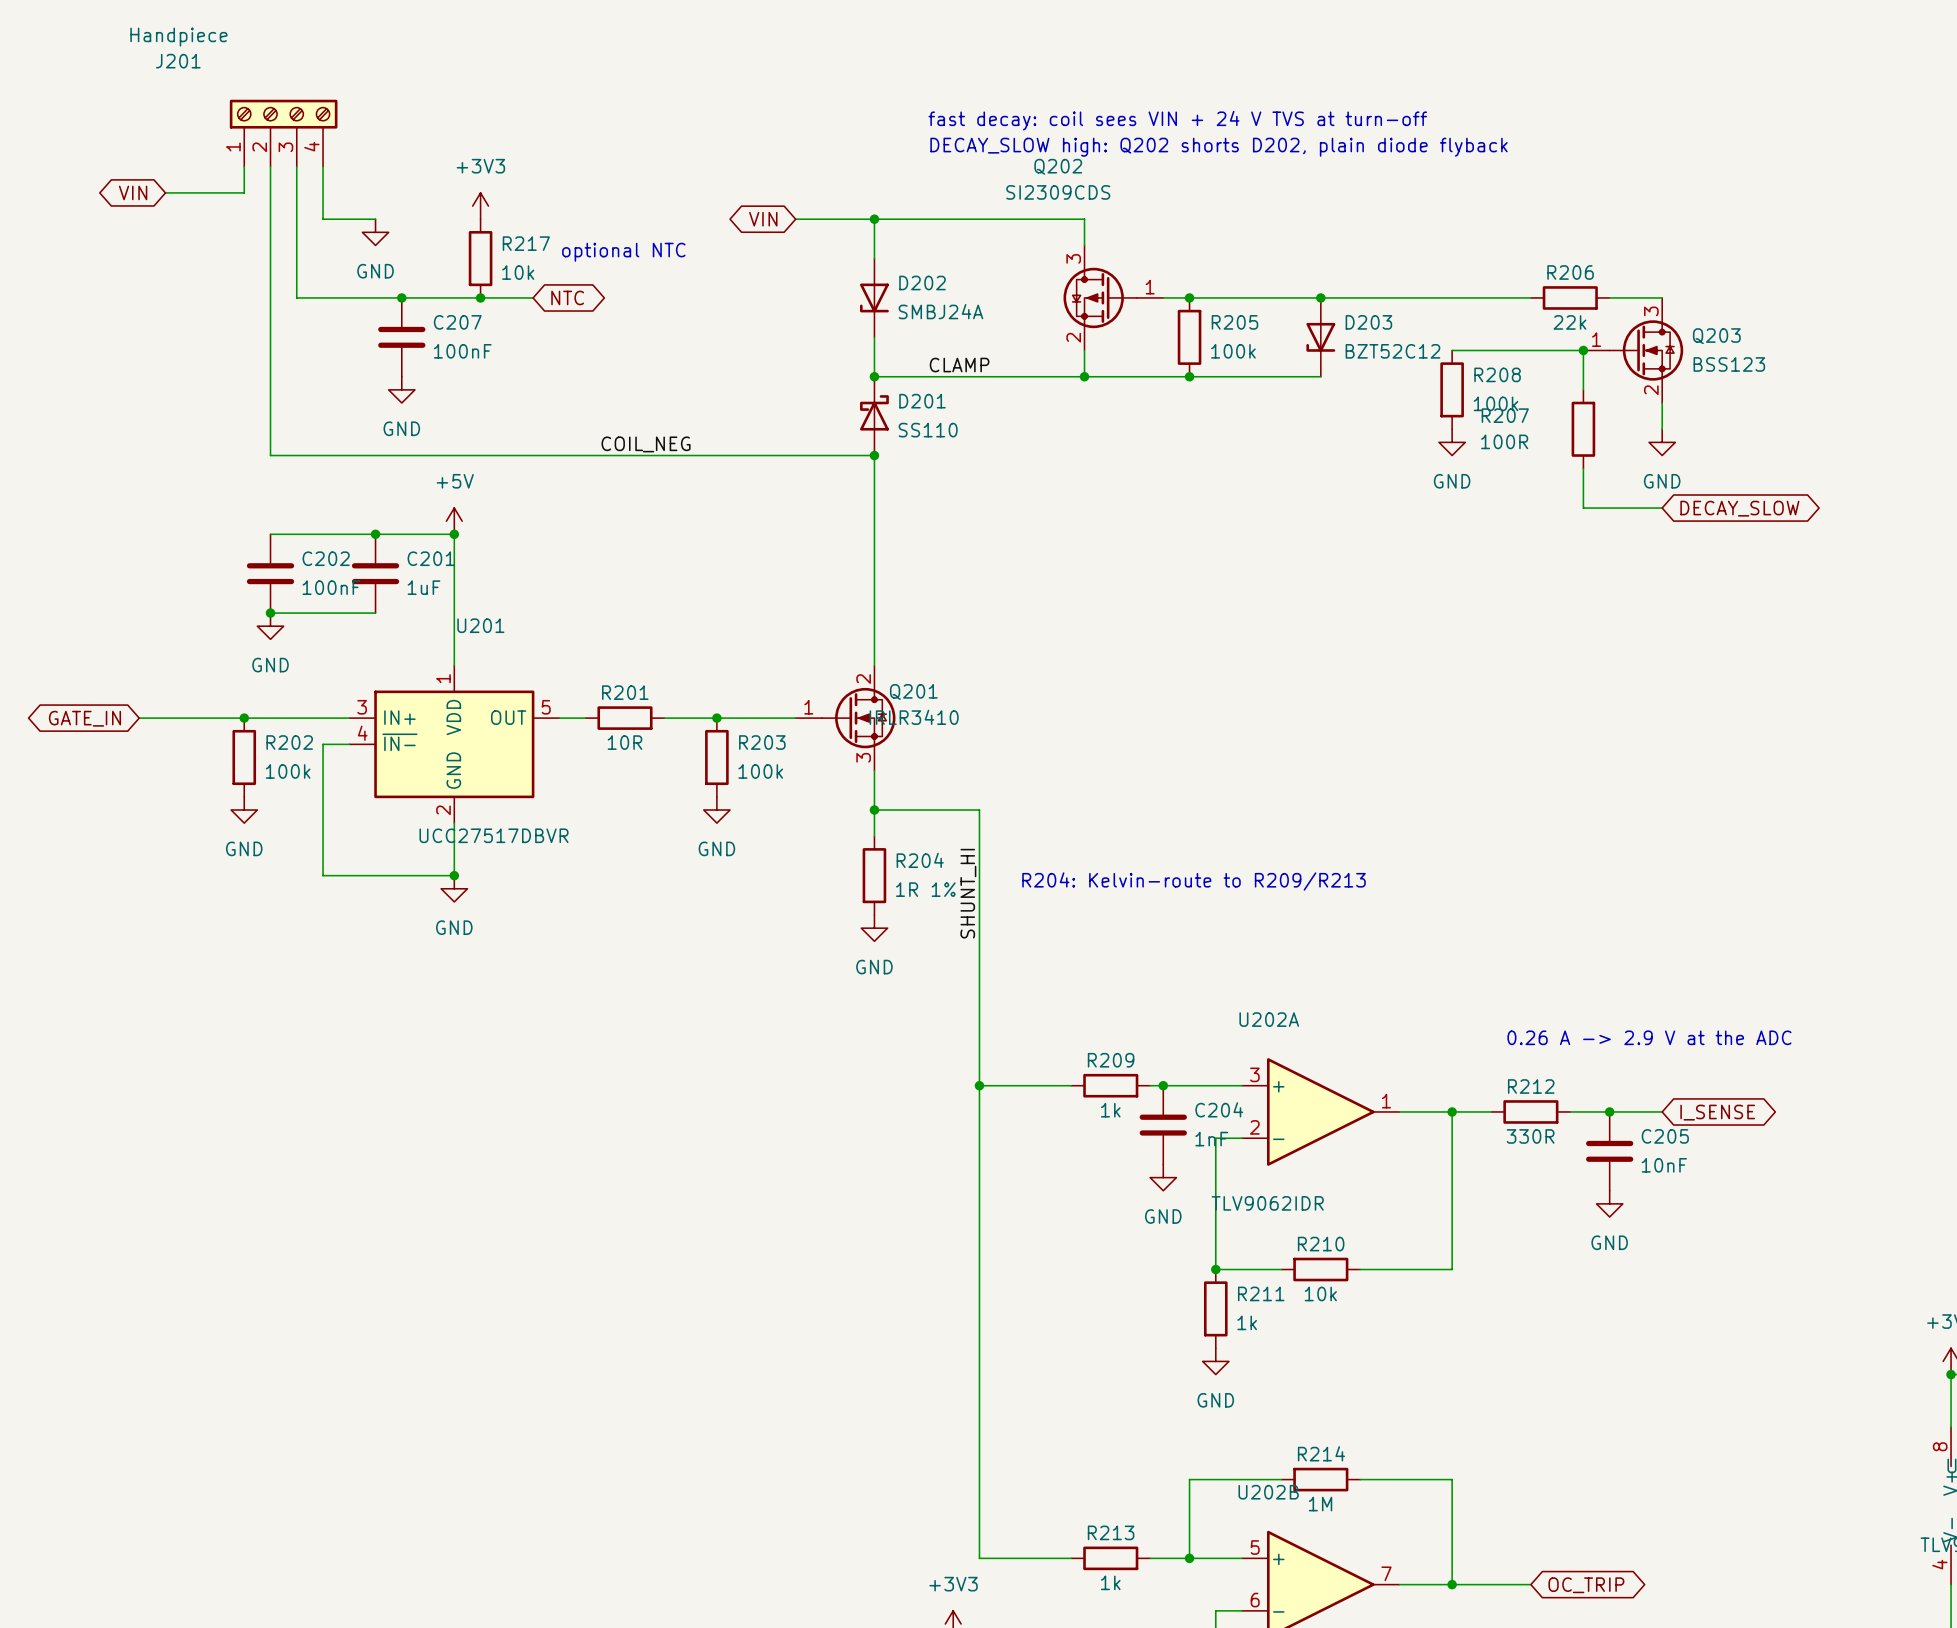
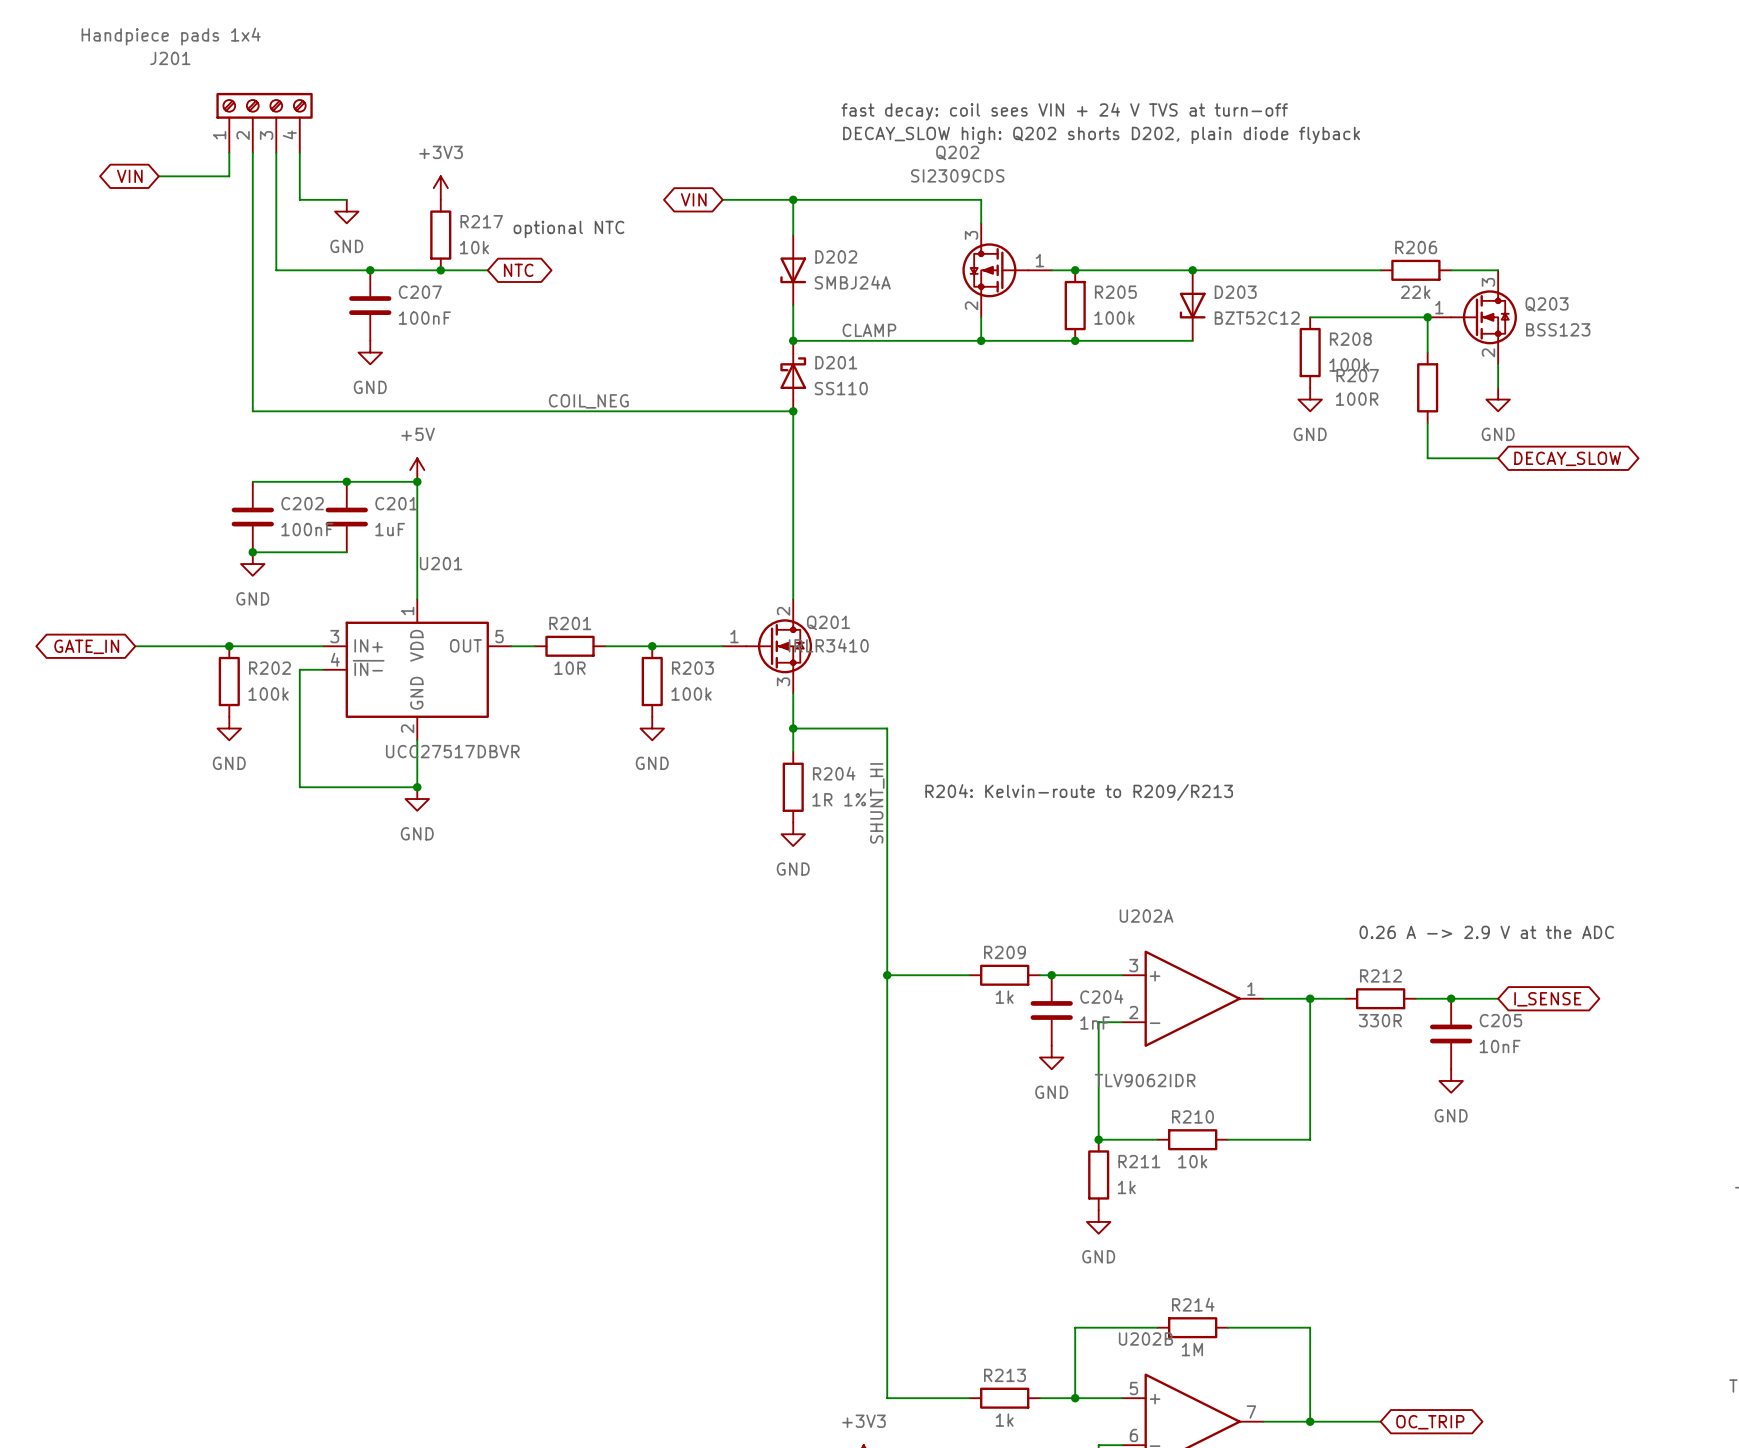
J201 value: Handpiece (178, 37) -> Handpiece pads 1x4 (171, 36)

